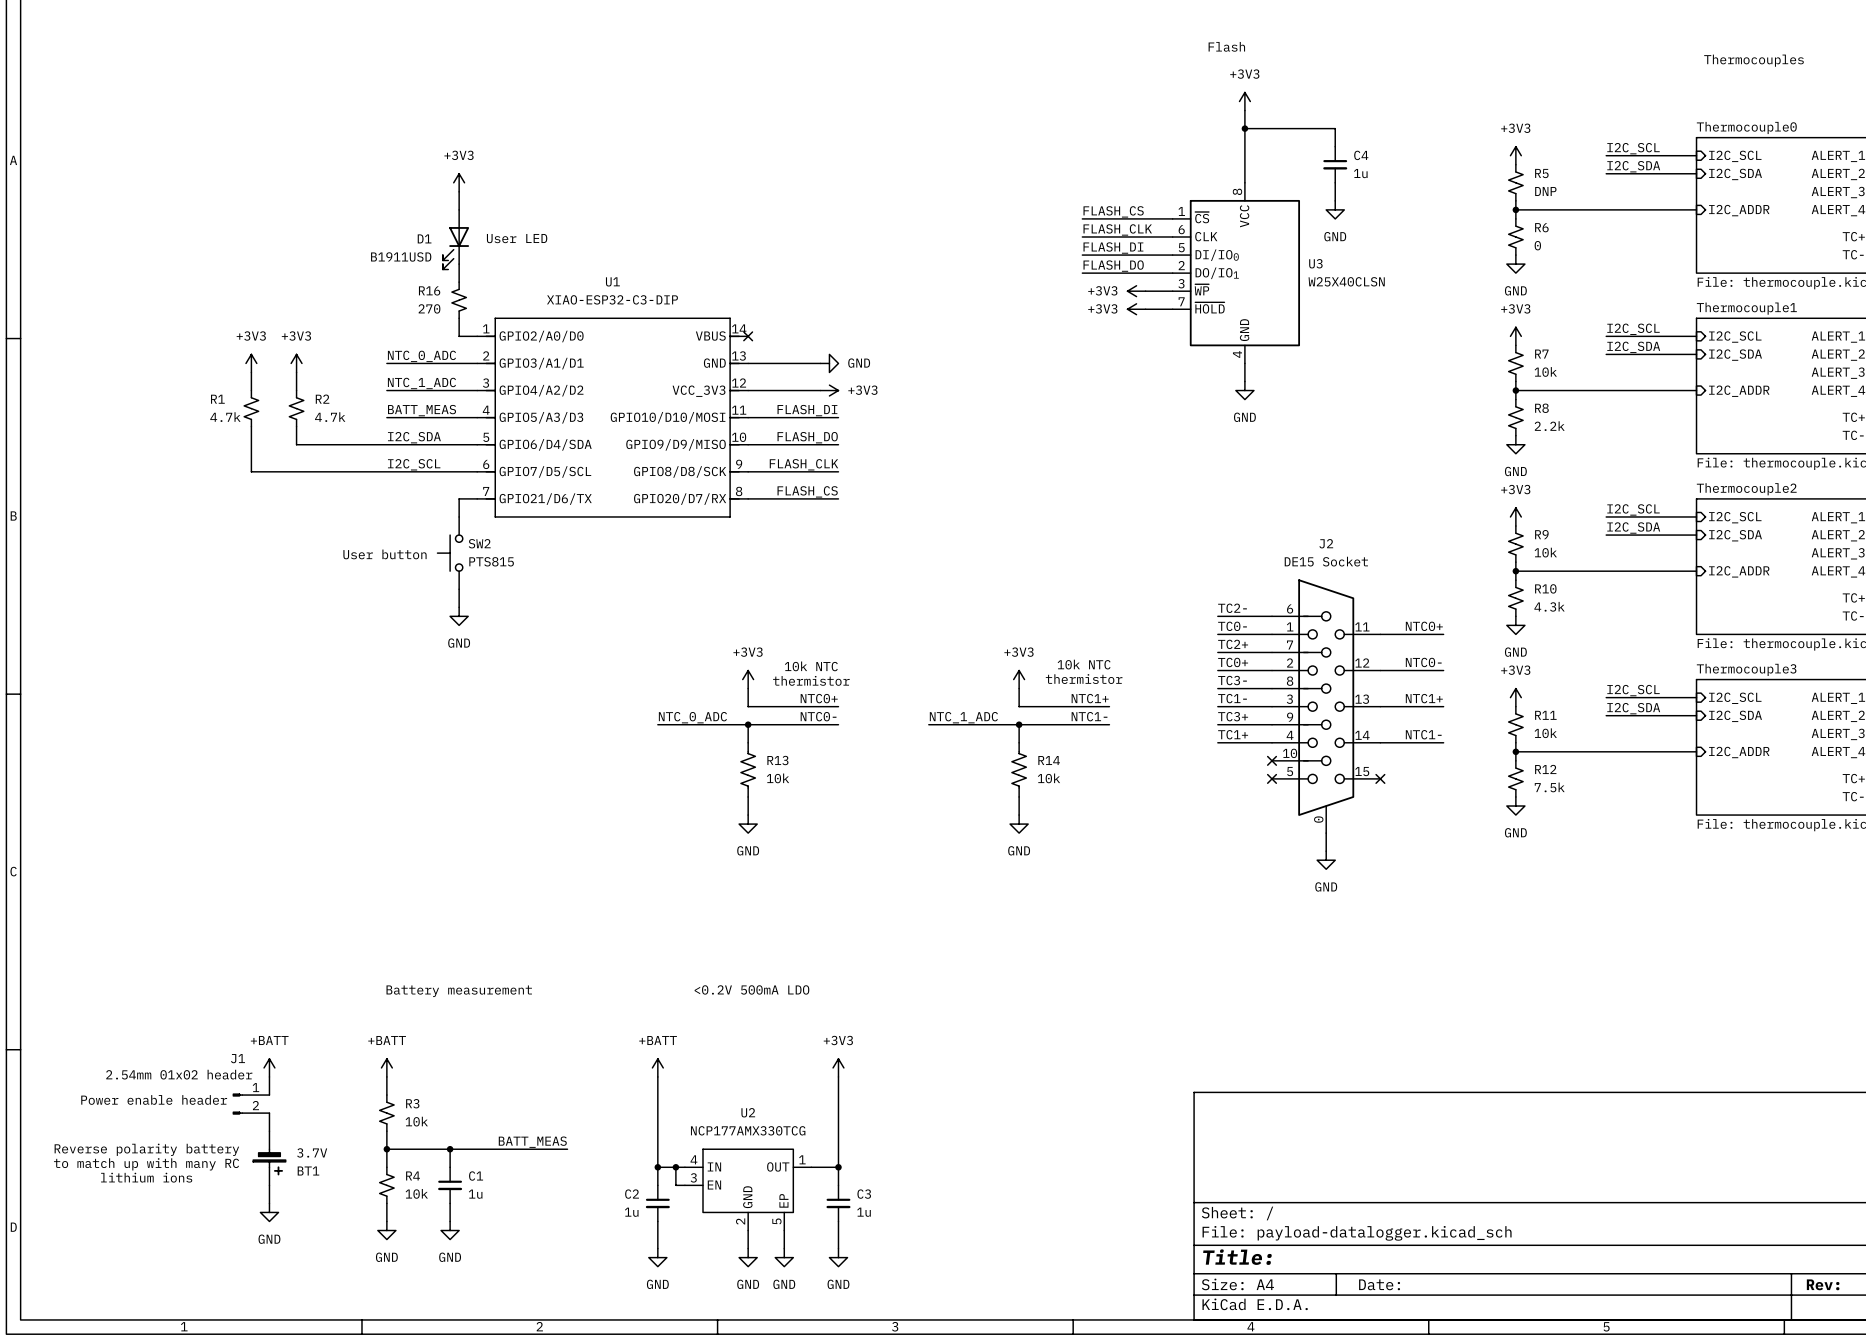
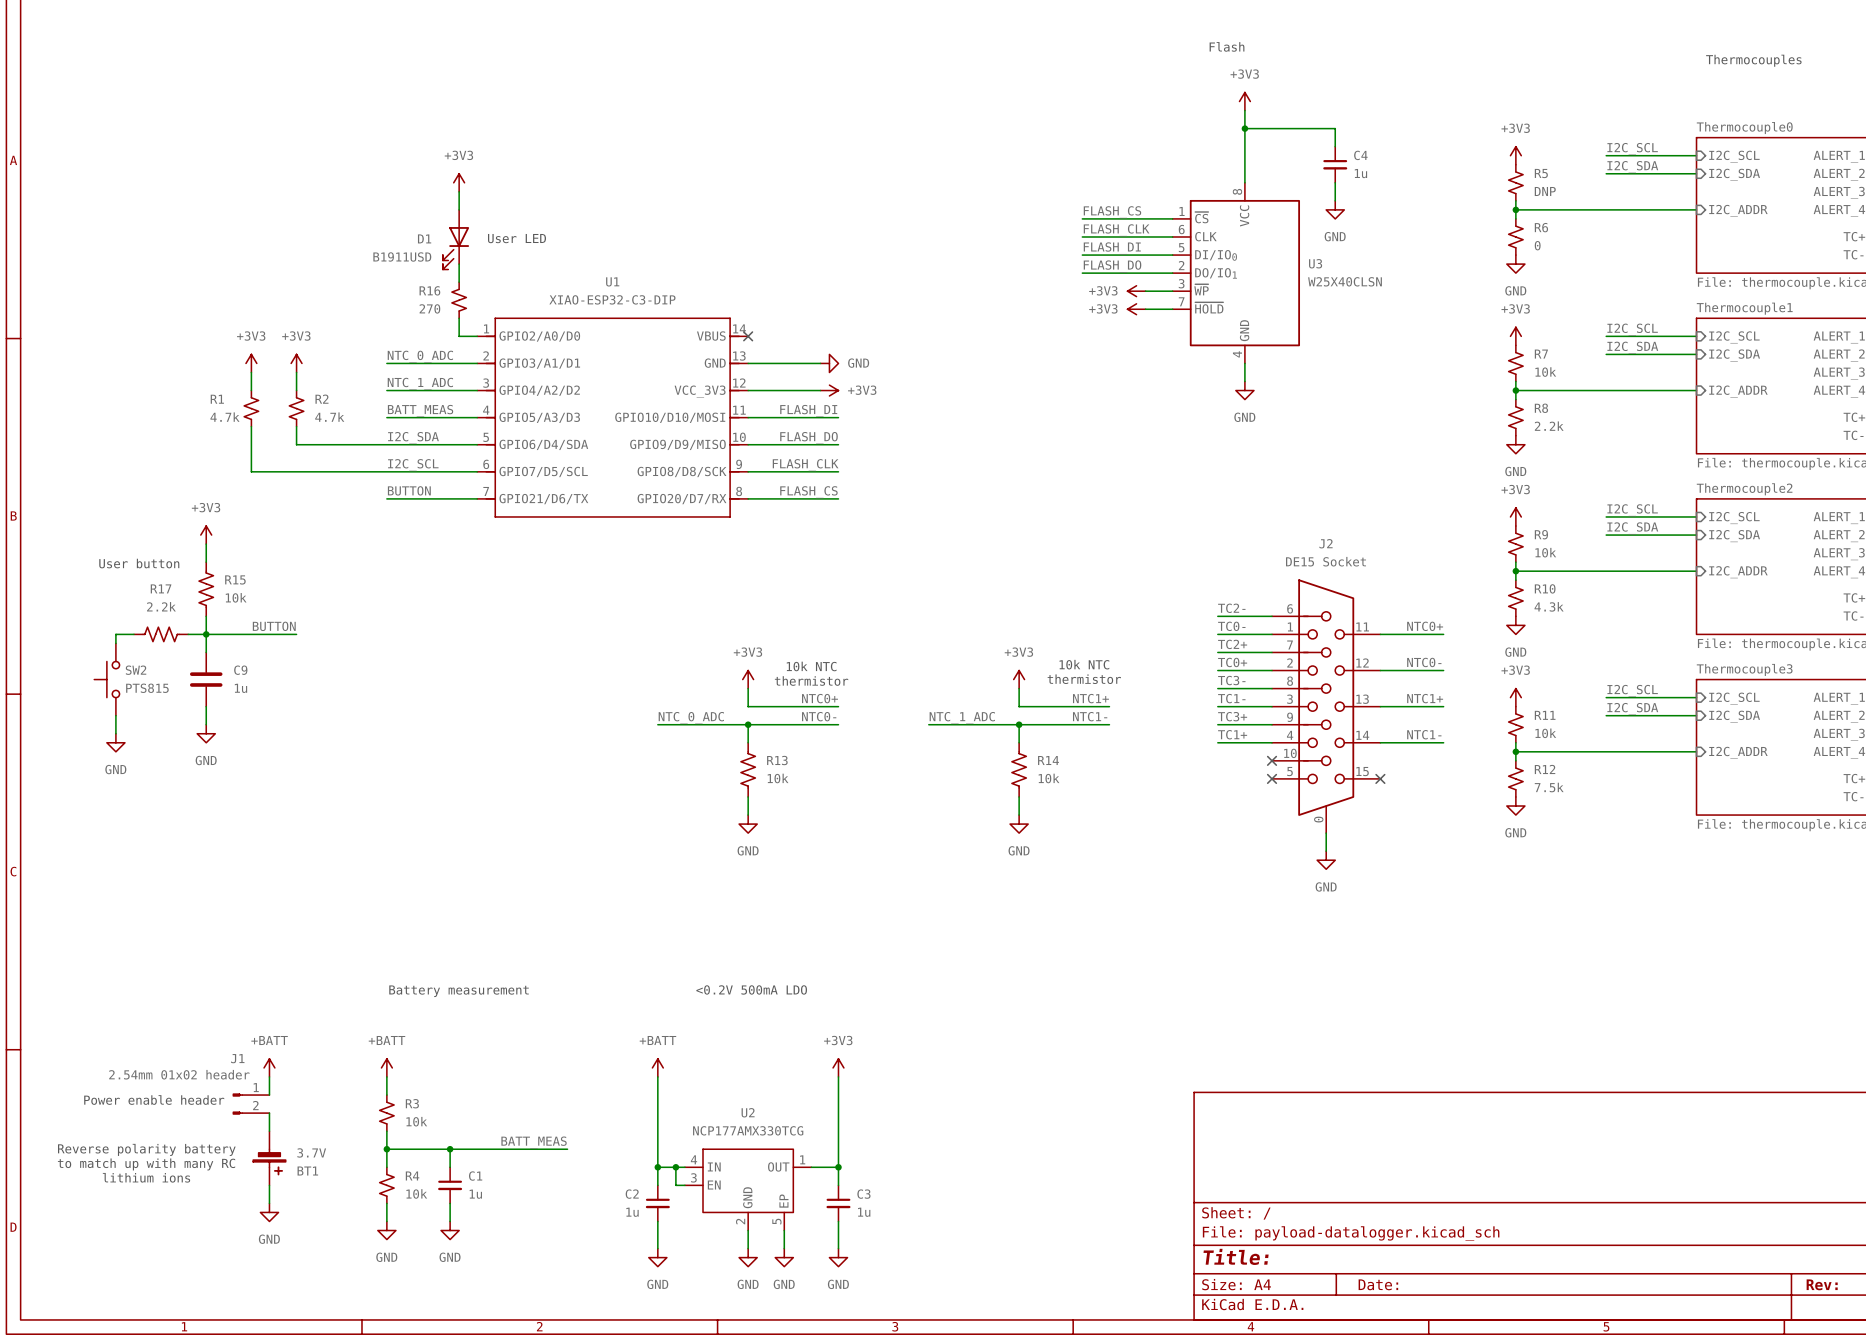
label: none -> BUTTON (409, 490)
wire: (459, 498) (459, 516) -> (459, 498) (386, 498)
power symbol: none -> +3V3 (206, 535)
wire: none -> (206, 544) (206, 562)
SW2 position: (450, 553) -> (106, 679)
text: User button (384, 554) -> none
text: none -> User button (139, 563)
R15: none -> 10k (206, 589)
wire: (459, 589) (459, 607) -> none
wire: none -> (206, 616) (206, 652)
power symbol: GND (459, 616) -> none
label: none -> BUTTON (274, 626)
wire: none -> (133, 634) (115, 634) (115, 643)
R17: none -> 2.2k (161, 634)
wire: none -> (188, 634) (296, 634)
junction: none -> (206, 634)
C9: none -> 1u (206, 679)
wire: none -> (206, 706) (206, 724)
wire: none -> (115, 715) (115, 733)
power symbol: none -> GND (206, 733)
power symbol: none -> GND (115, 742)

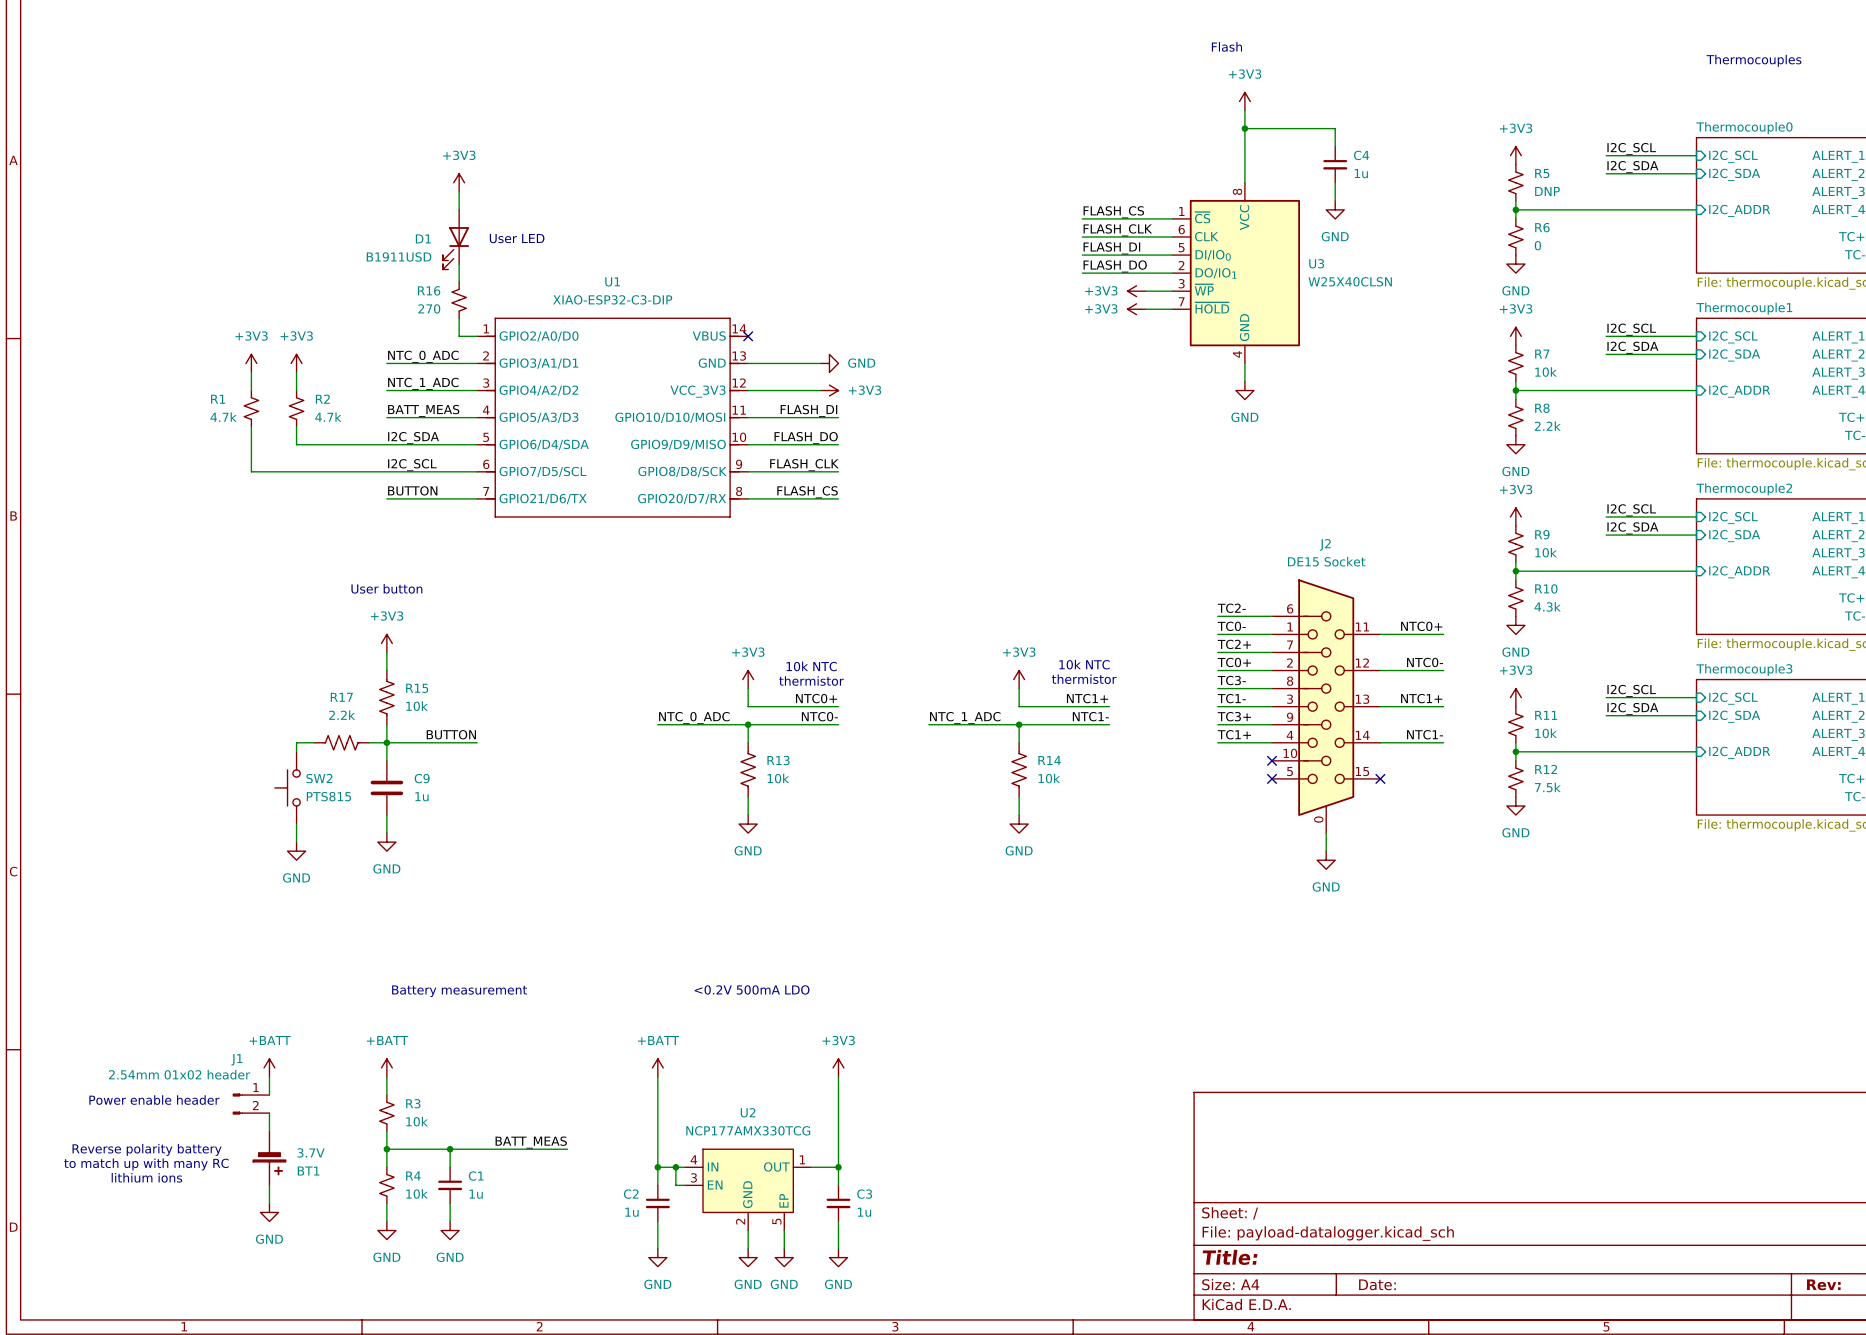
power symbol: +3V3 (206, 535) -> none
wire: (206, 544) (206, 562) -> none
text: User button (139, 563) -> none
text: none -> User button (386, 588)
R15 position: (206, 589) -> (386, 697)
wire: (206, 616) (206, 652) -> none
label: BUTTON (274, 626) -> none
wire: (133, 634) (115, 634) (115, 643) -> none
R17 position: (161, 634) -> (341, 742)
wire: (188, 634) (296, 634) -> none
junction: (206, 634) -> none
power symbol: none -> +3V3 (386, 643)
wire: none -> (386, 652) (386, 670)
SW2 position: (106, 679) -> (287, 787)
C9 position: (206, 679) -> (386, 787)
wire: (206, 706) (206, 724) -> (296, 824) (296, 842)
wire: (115, 715) (115, 733) -> none
wire: none -> (386, 724) (386, 760)
power symbol: GND (206, 733) -> none
label: none -> BUTTON (451, 734)
power symbol: GND (115, 742) -> none
wire: none -> (314, 742) (296, 742) (296, 751)
wire: none -> (368, 742) (477, 742)
junction: none -> (386, 742)
wire: none -> (386, 815) (386, 833)
power symbol: none -> GND (386, 842)
power symbol: none -> GND (296, 851)

